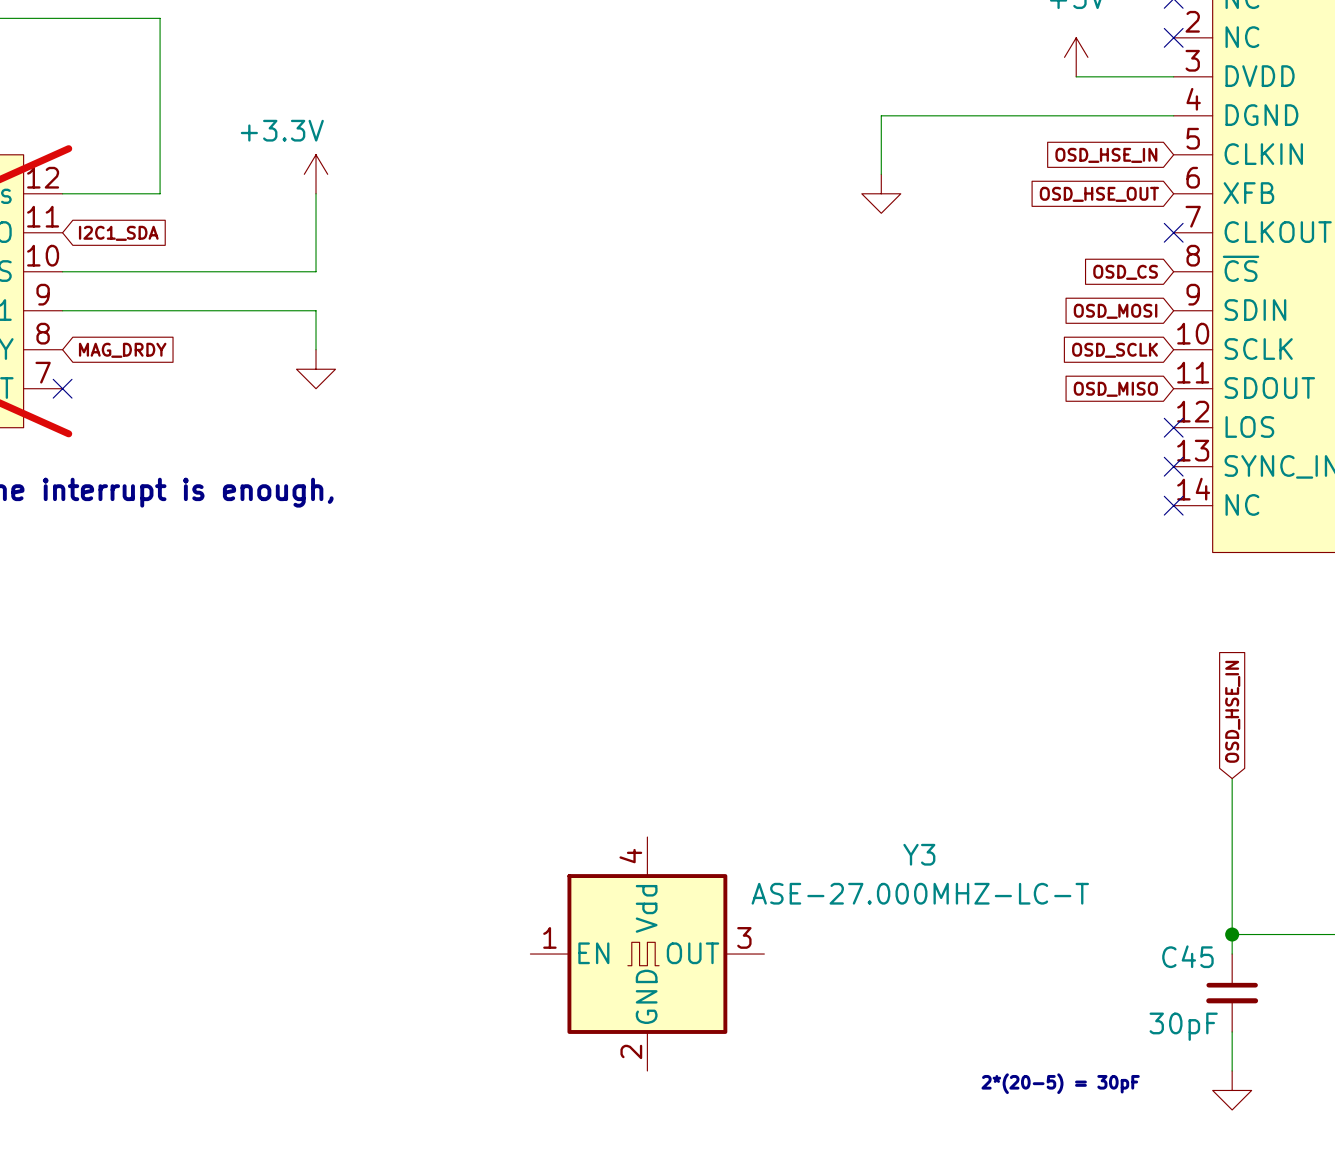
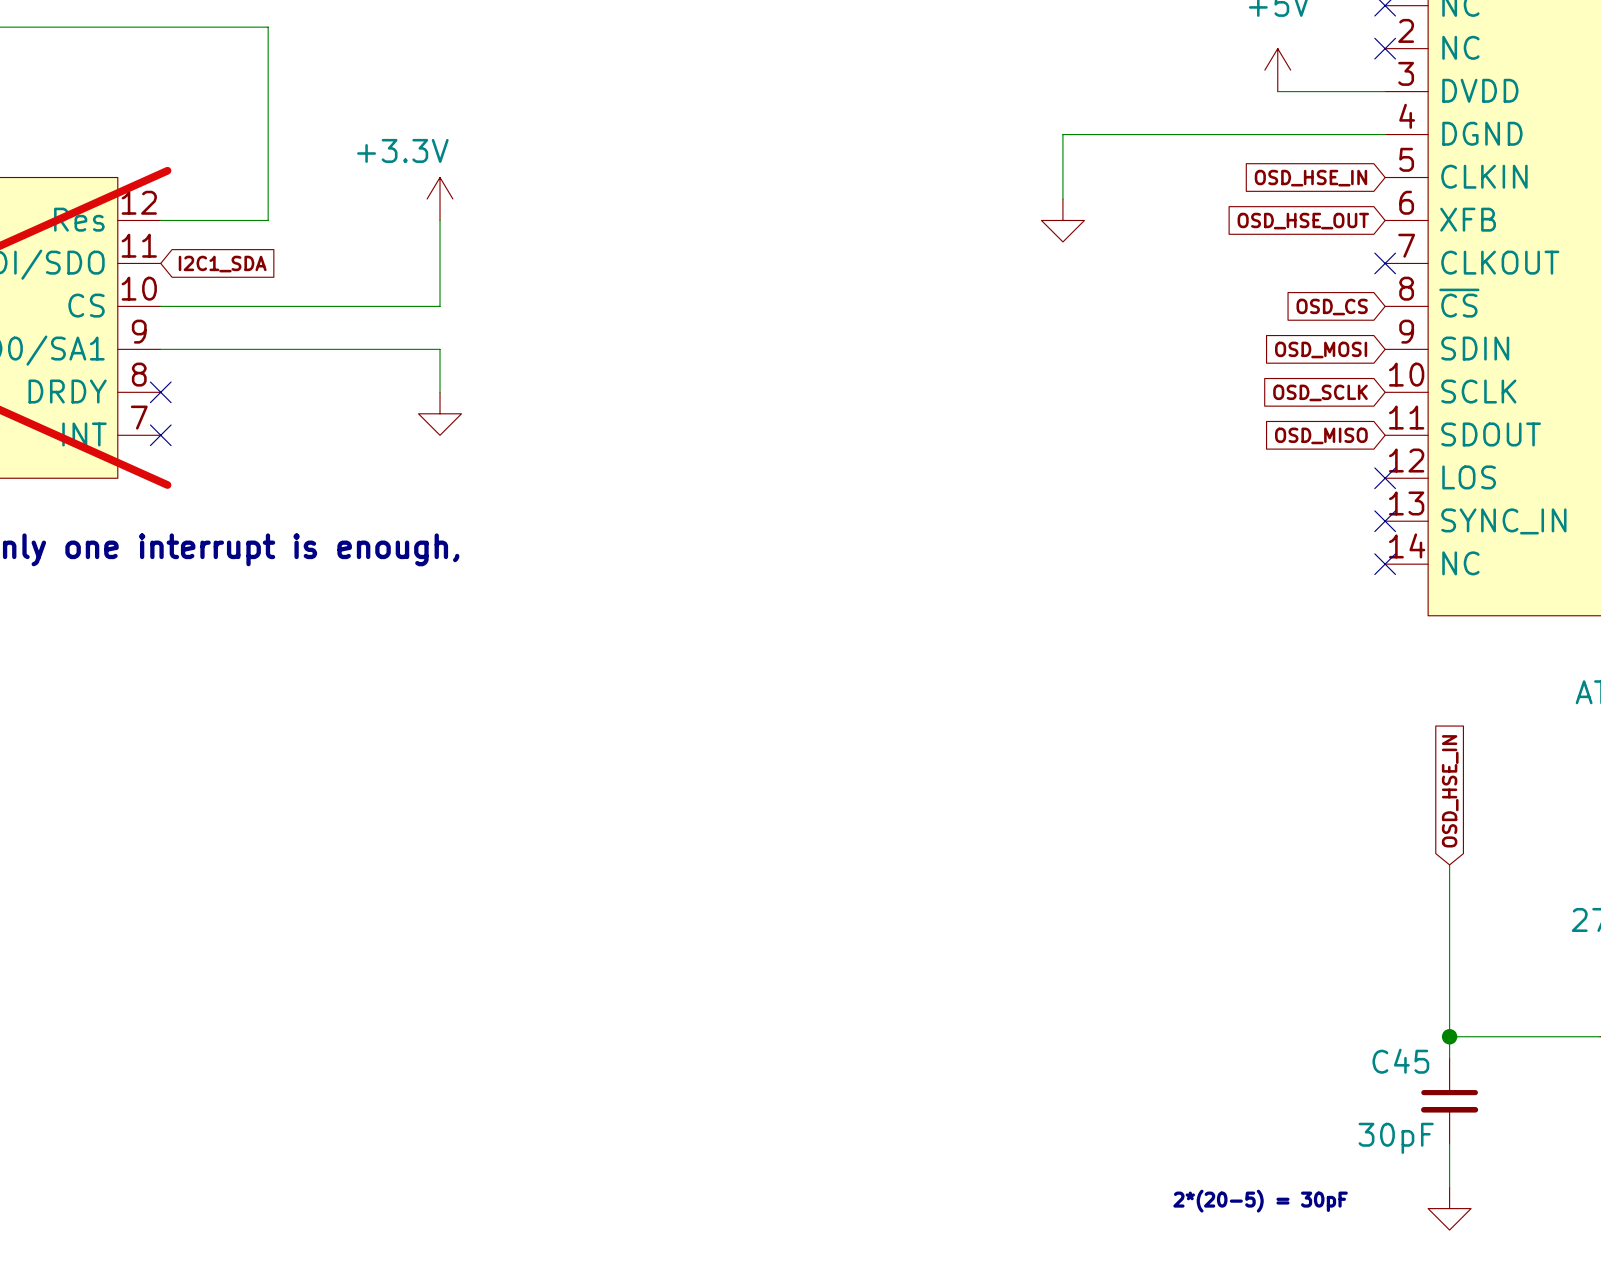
no-connect mark: none -> (160, 392)
global label: MAG_DRDY (122, 350) -> none
Y3: ASE-27.000MHZ-LC-T (647, 954) -> none

